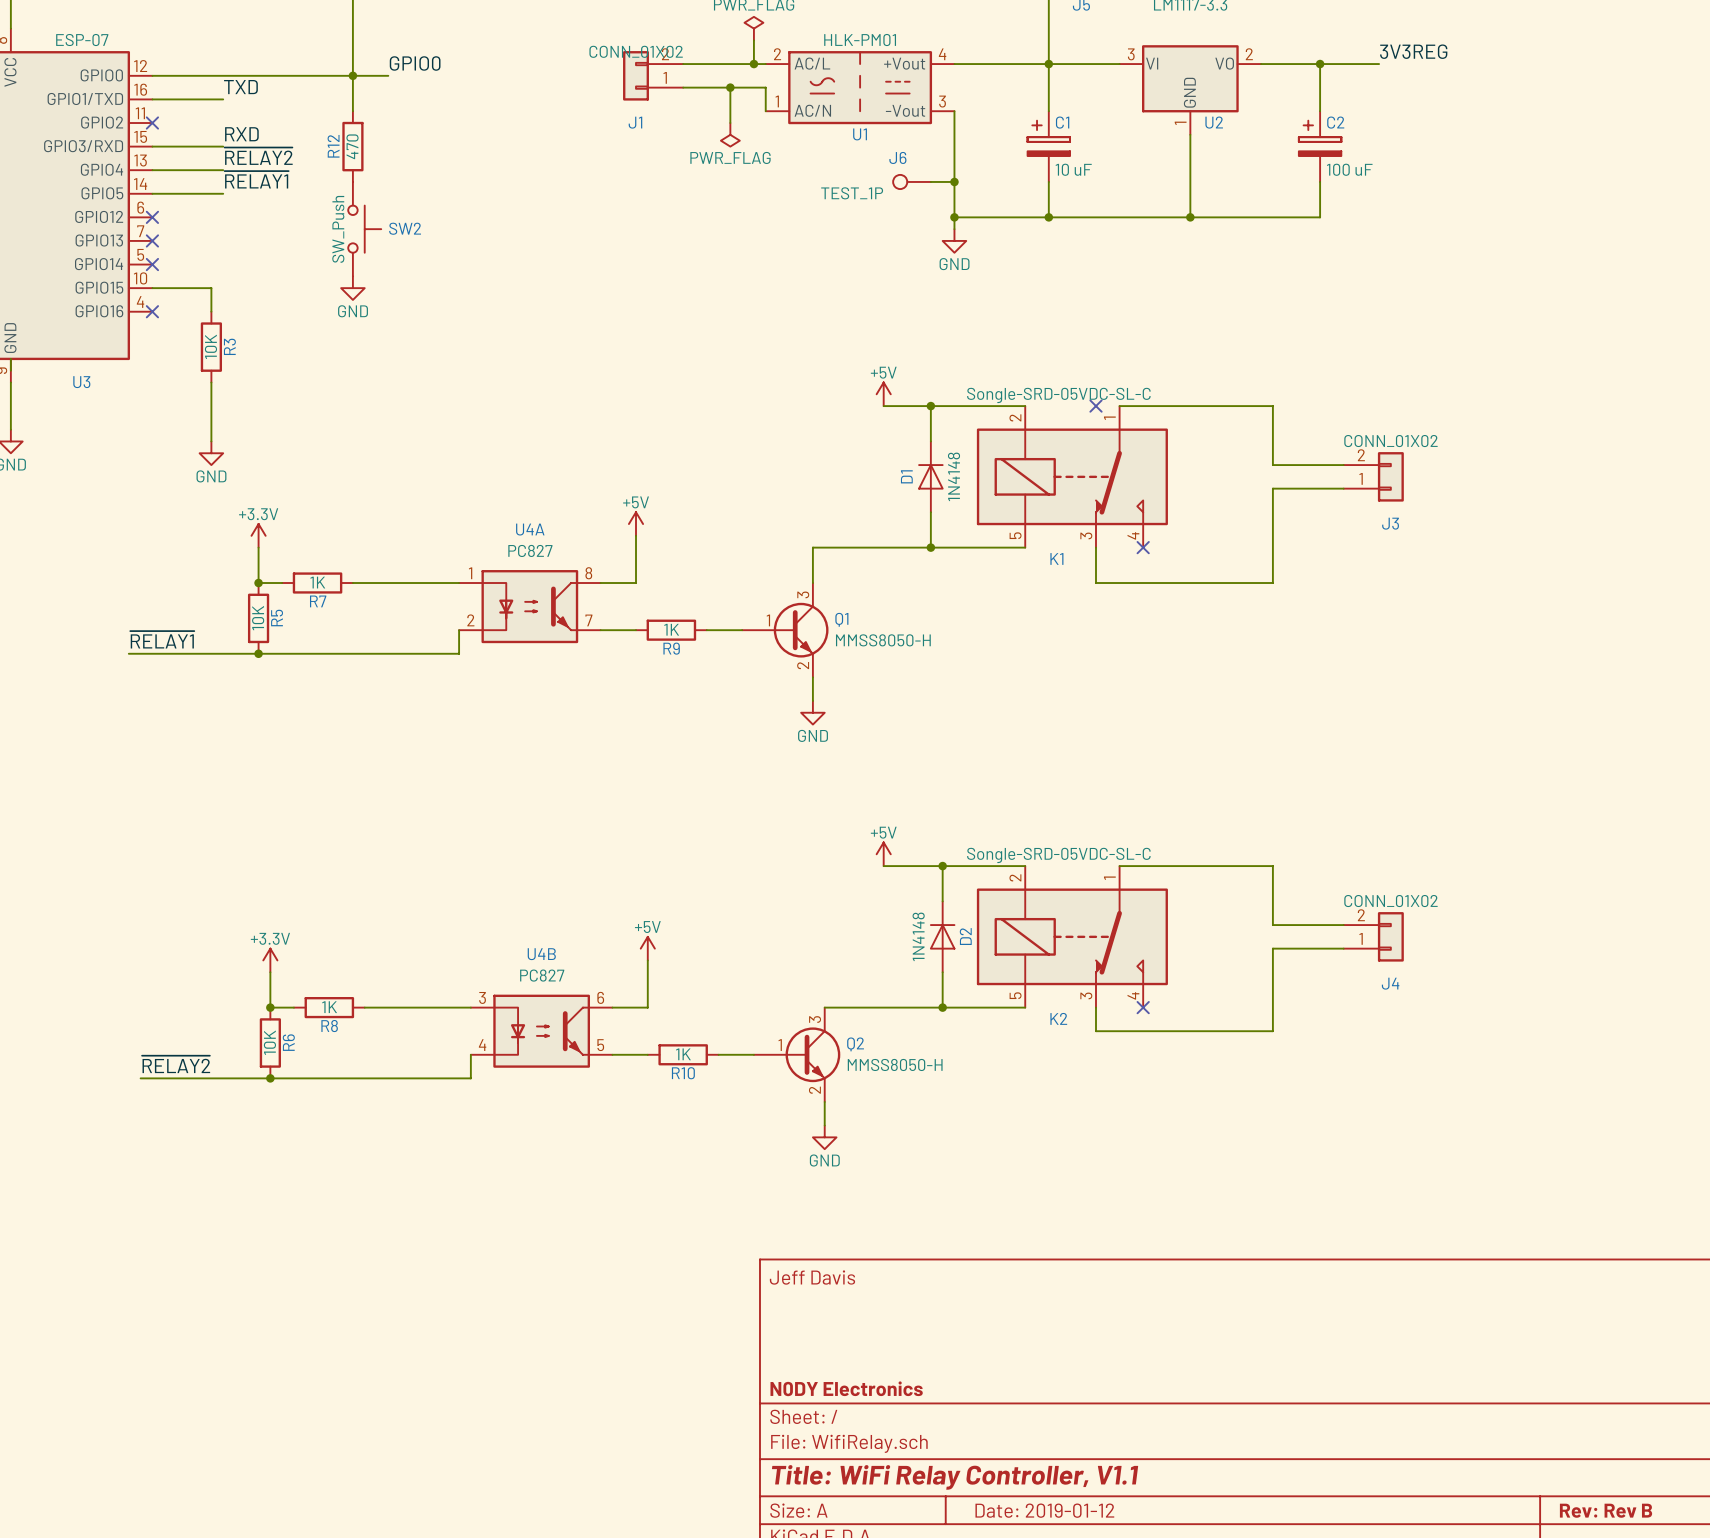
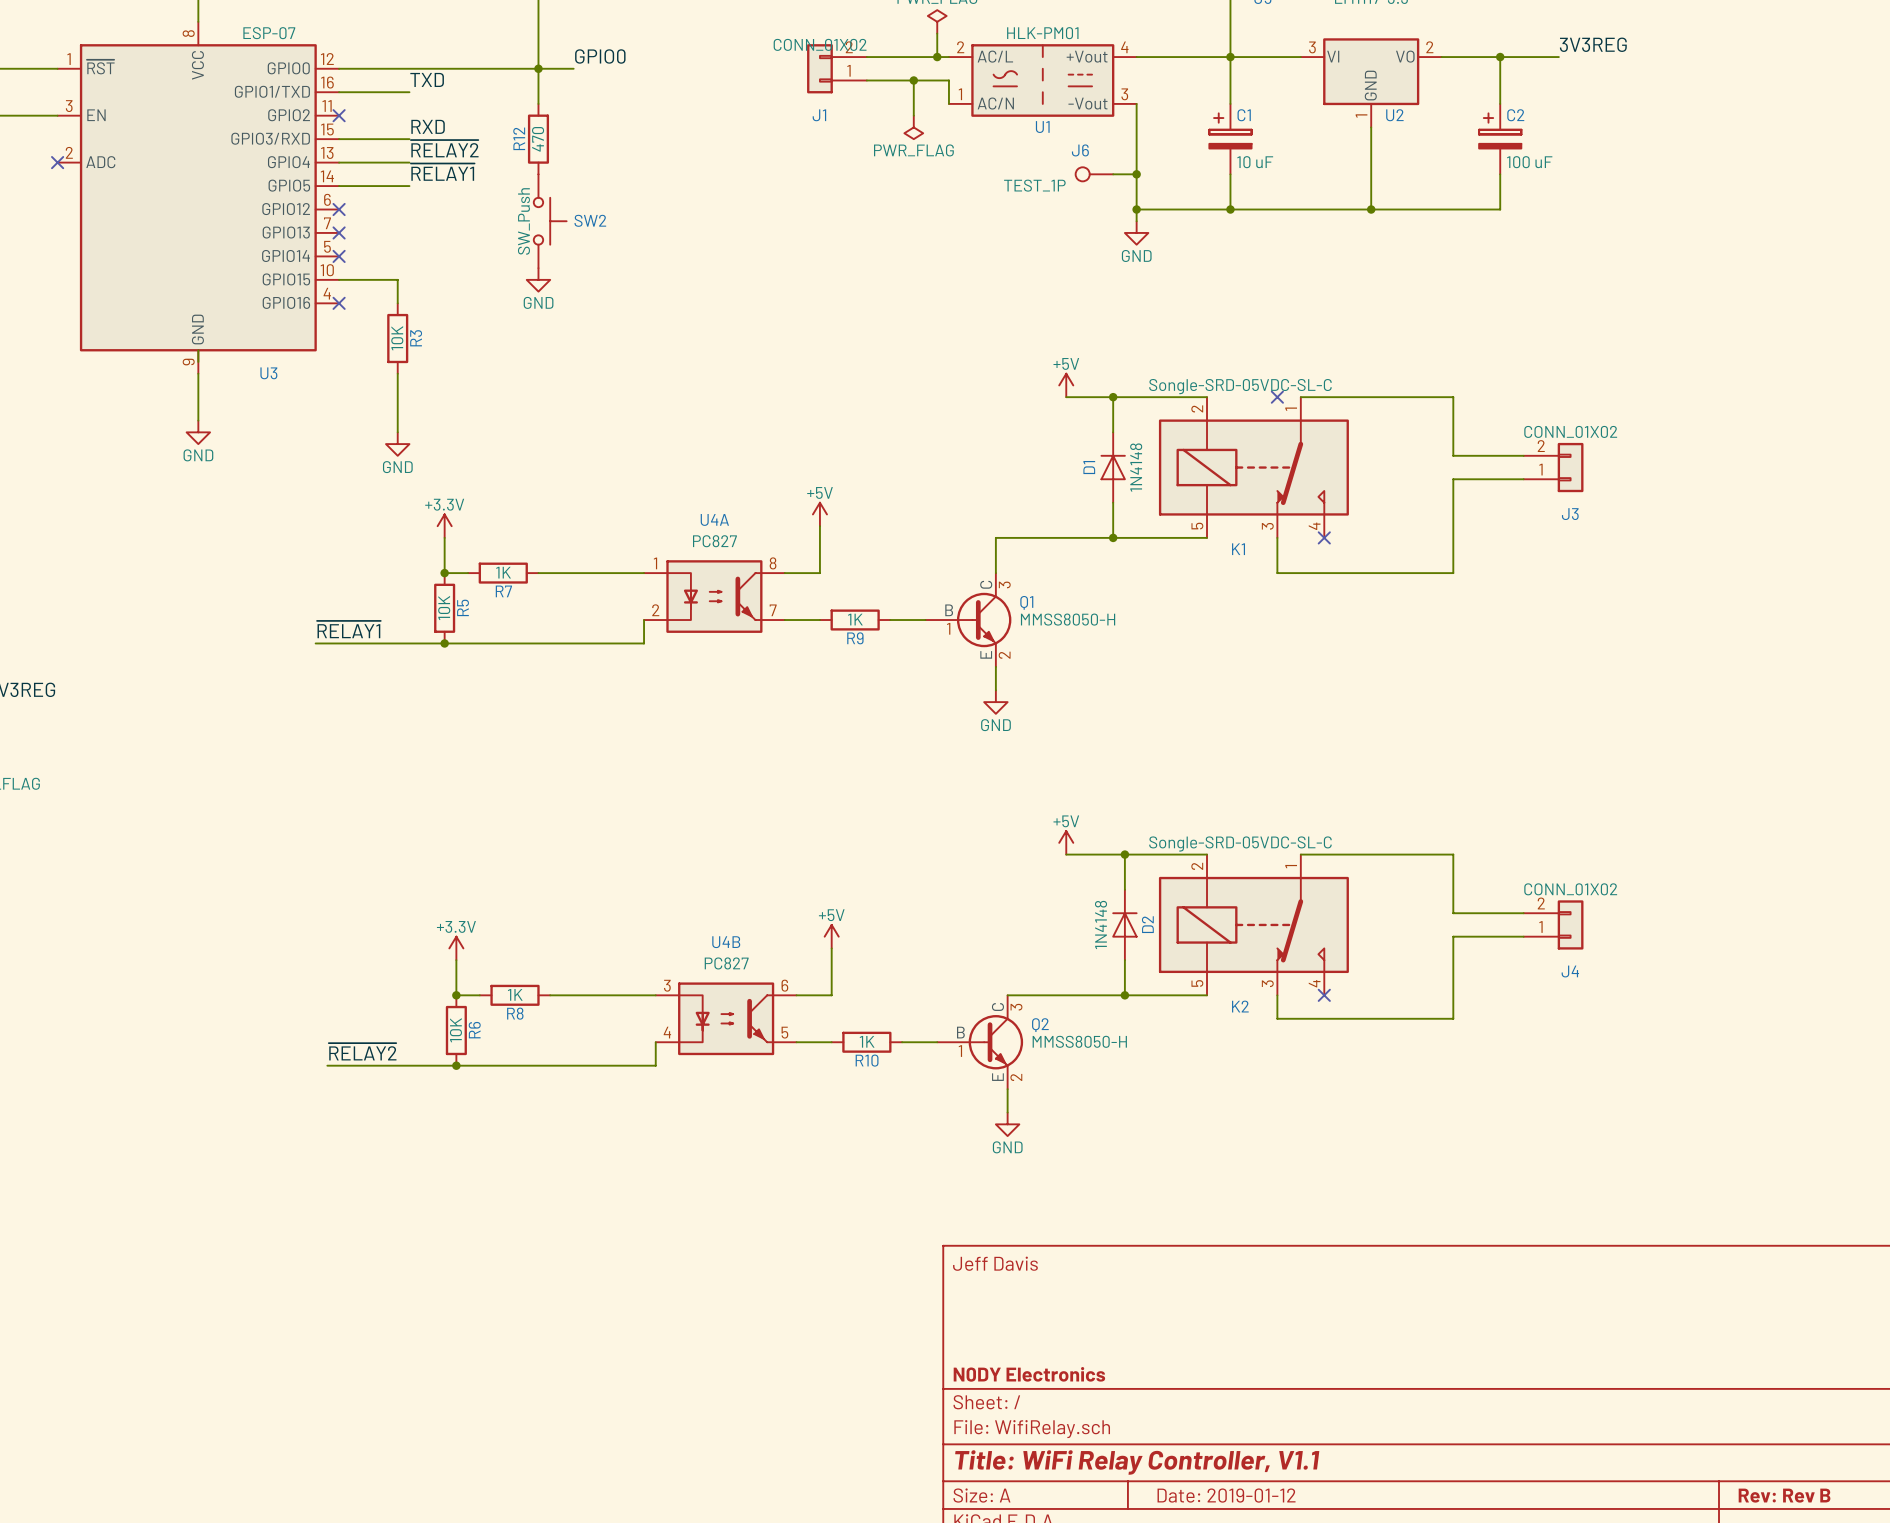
Q1 symbol: [742, 583, 829, 678] -> [925, 573, 1012, 667]
Q2 symbol: [753, 1007, 841, 1102] -> [937, 995, 1024, 1090]

